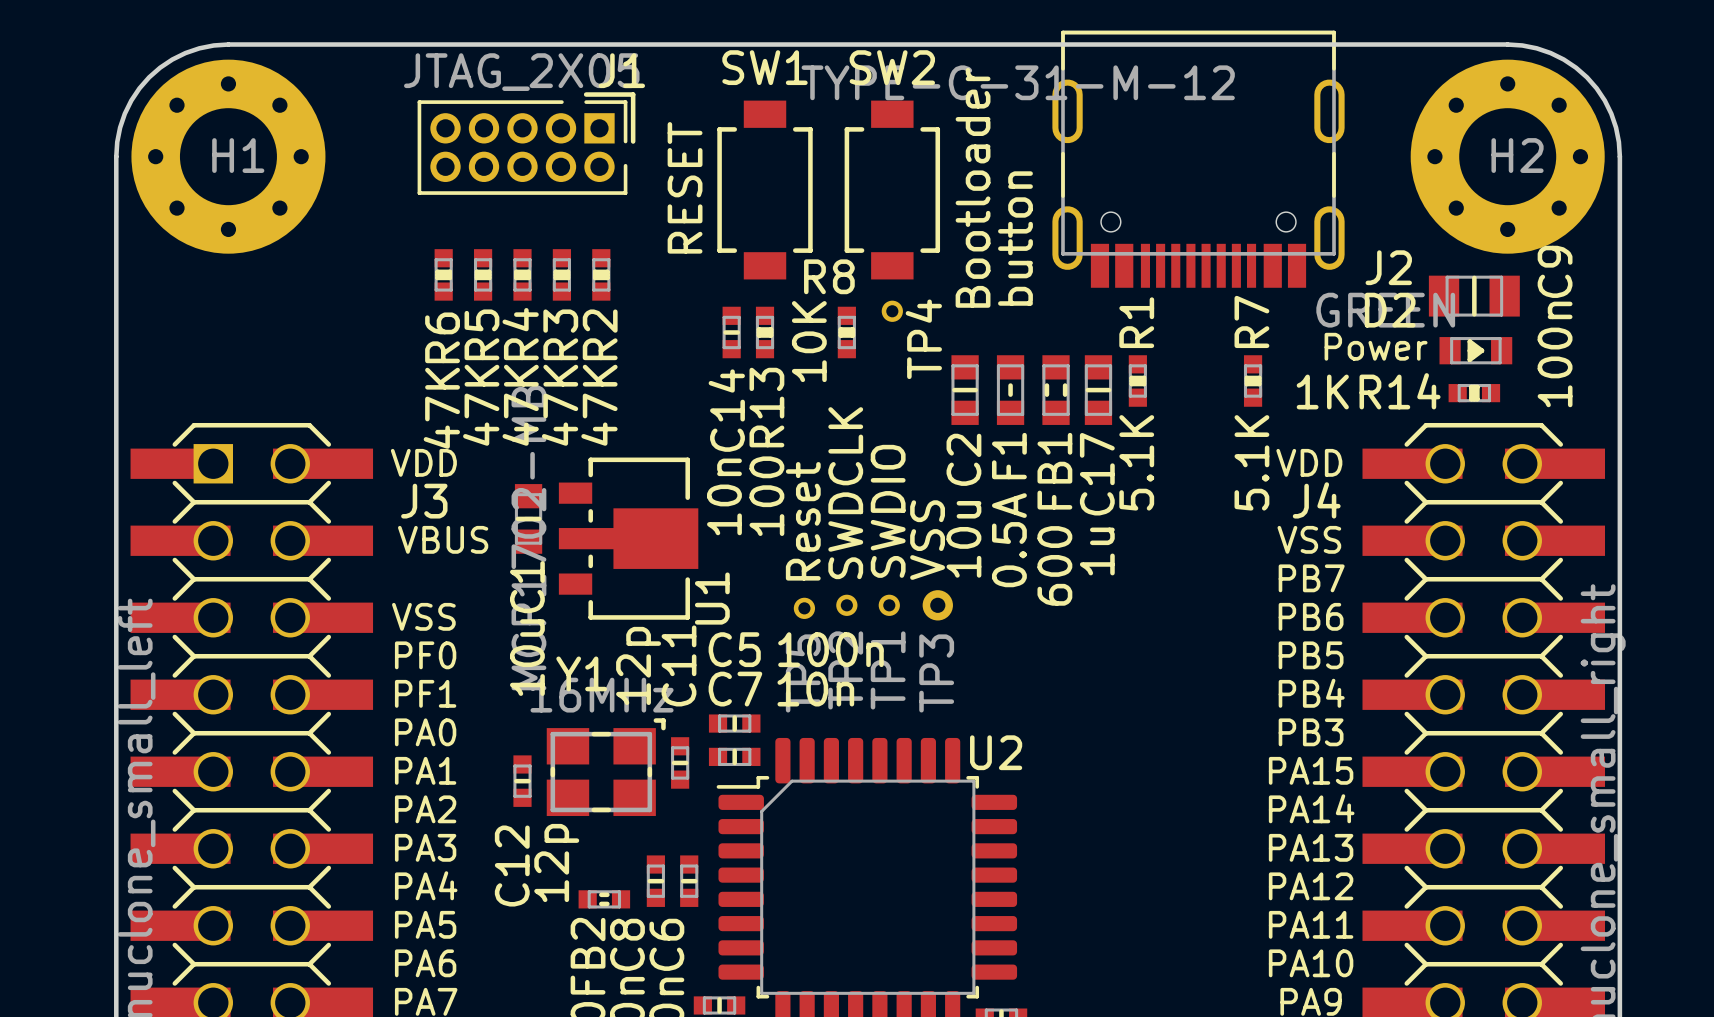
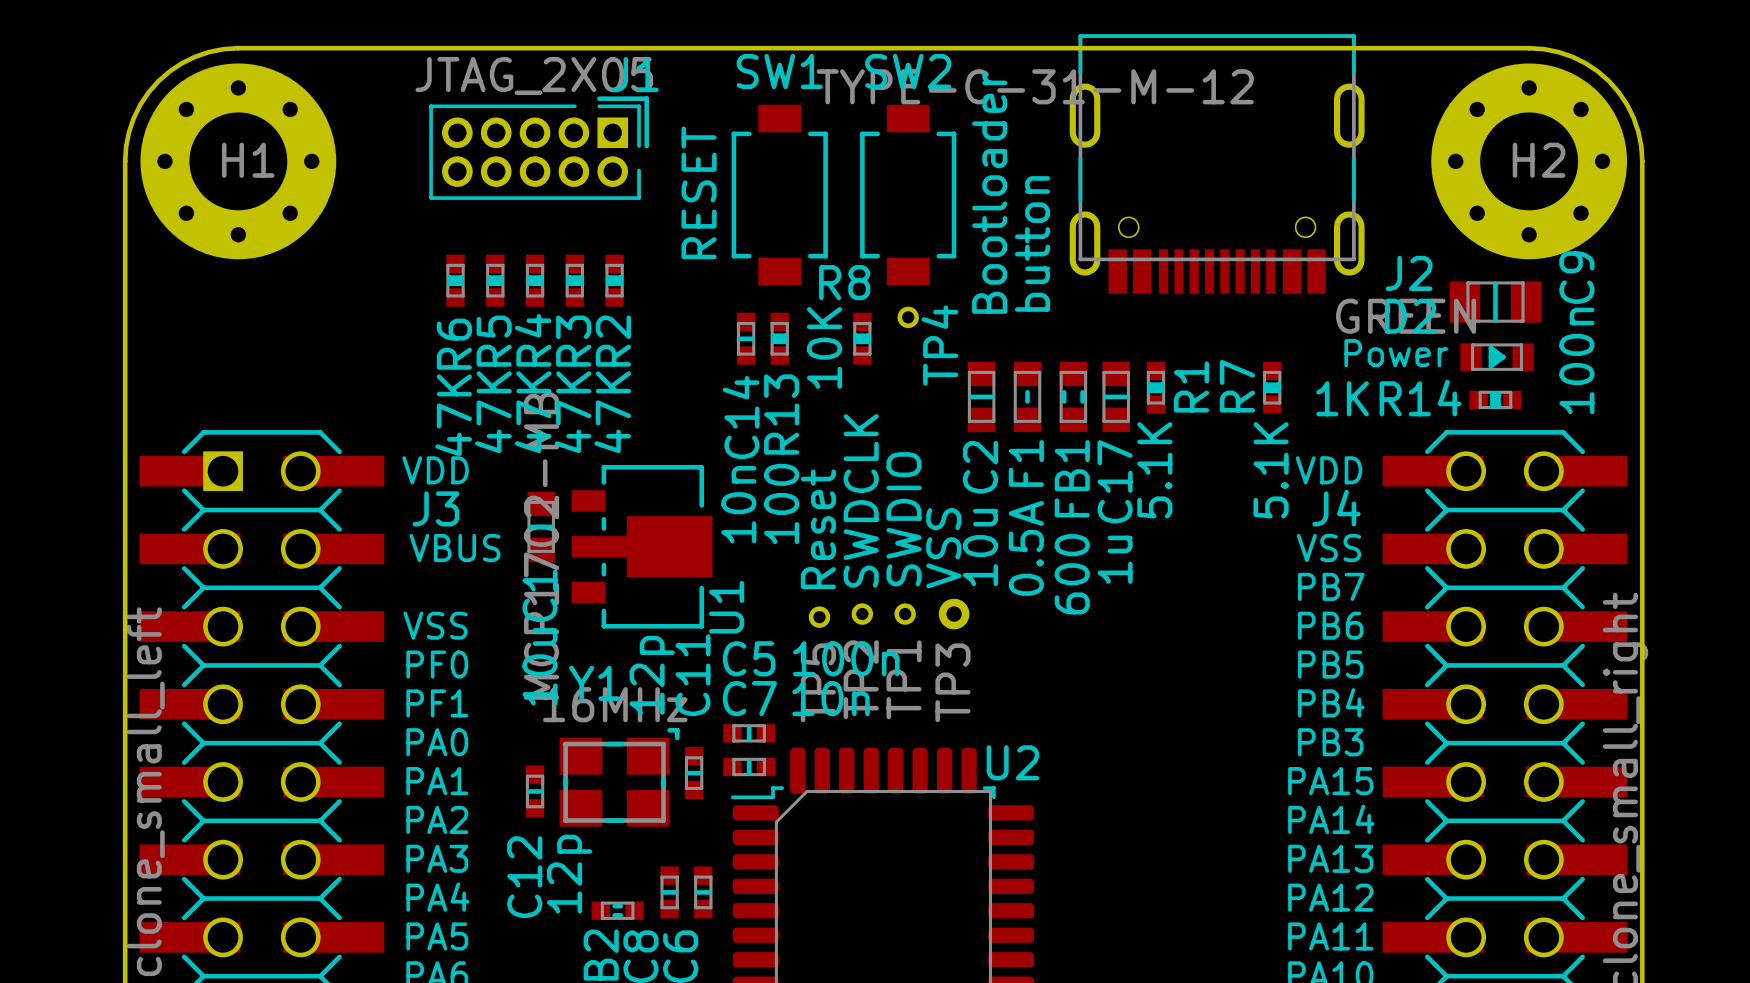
R7 name position: R7 (1251, 321) -> R7 (1237, 386)
R1 name position: R1 (1136, 322) -> R1 (1191, 386)

